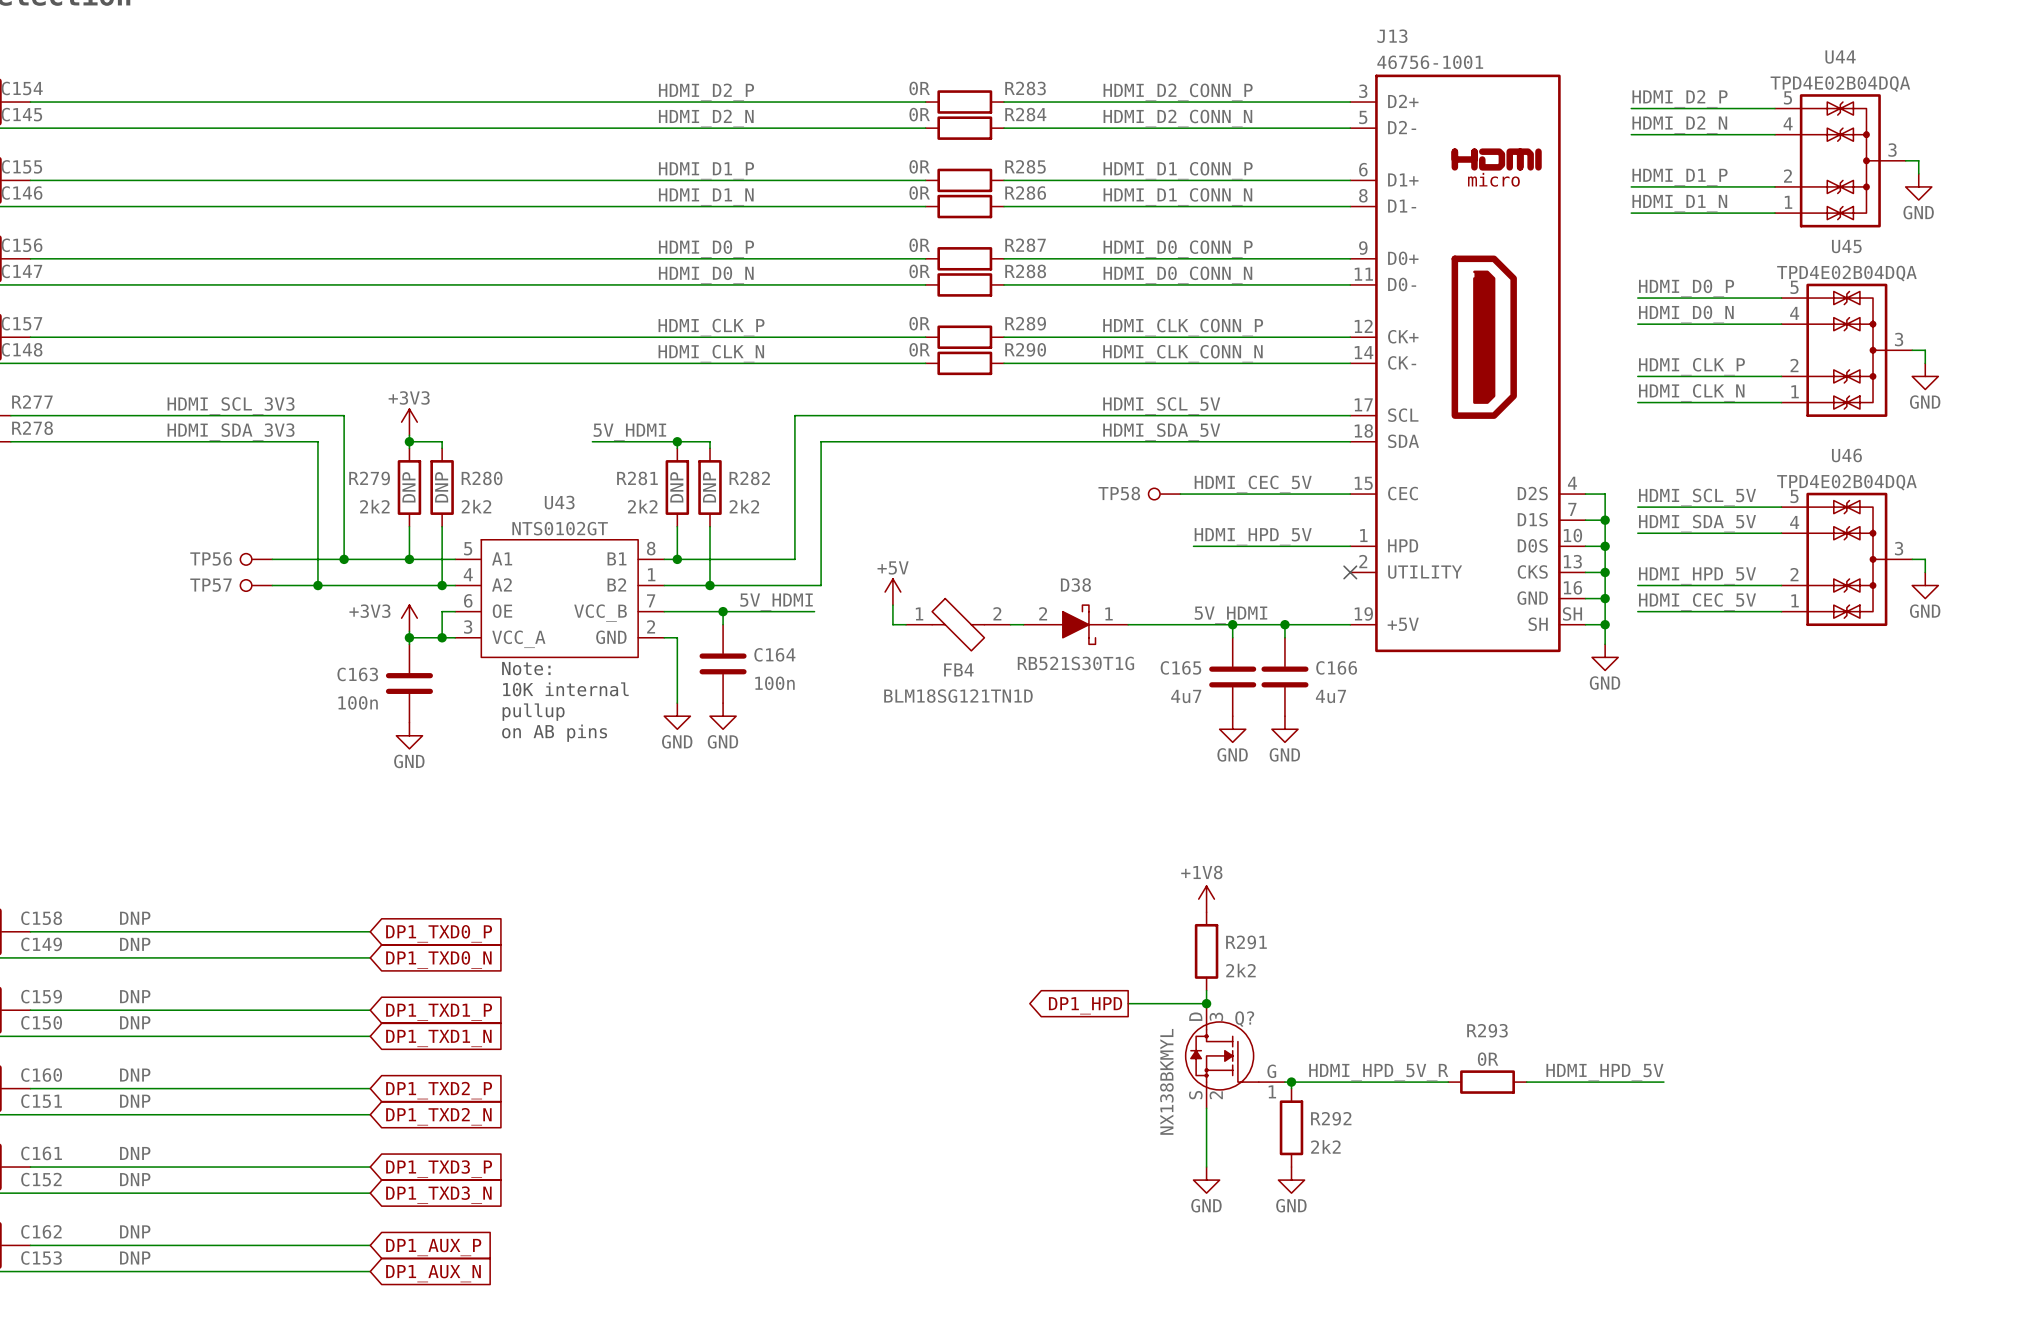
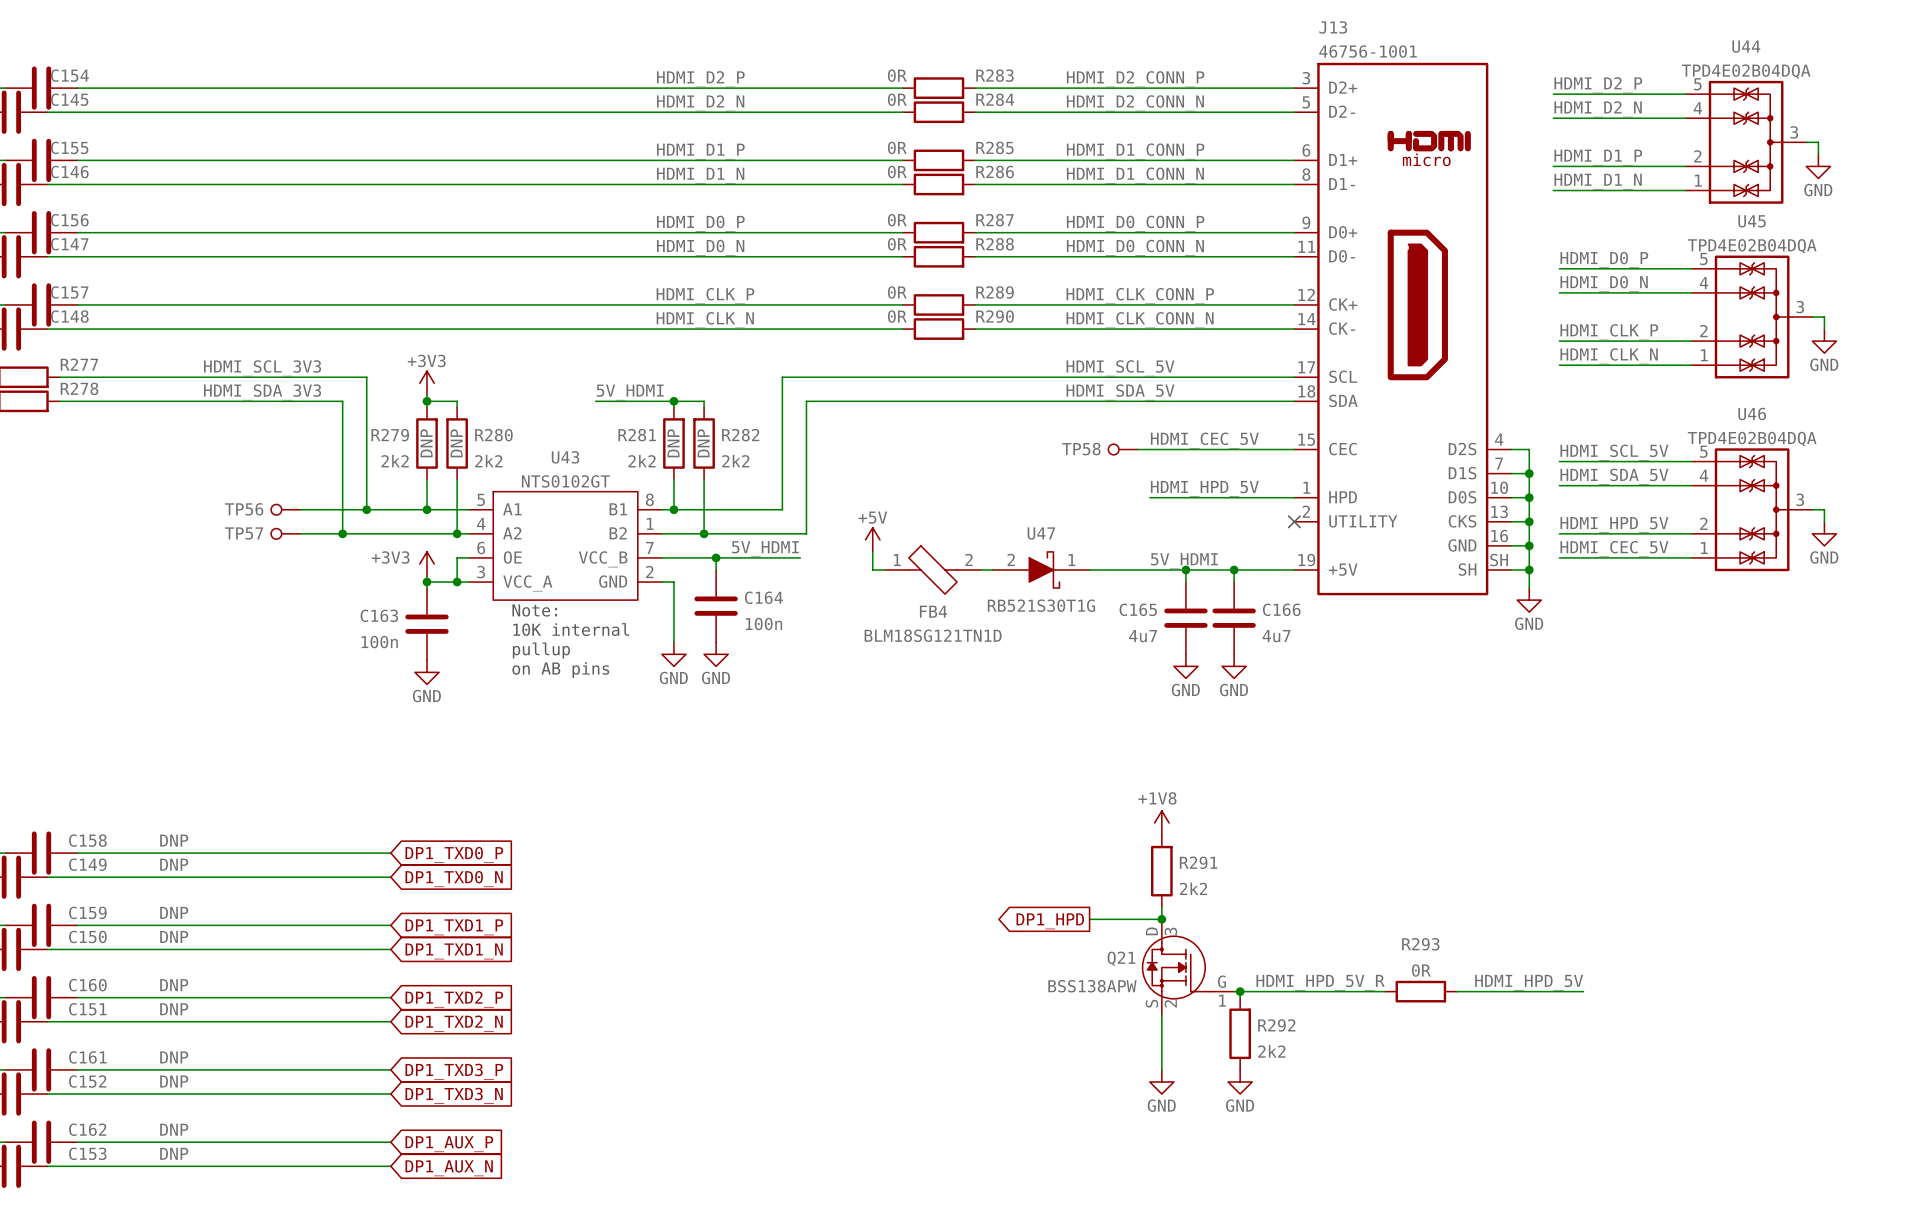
D38 name: D38 (1075, 585) -> U47 (1041, 533)
Q? name: Q? (1244, 1019) -> Q21 (1121, 958)
Q? value: NX138BKMYL (1166, 1081) -> BSS138APW (1092, 986)

